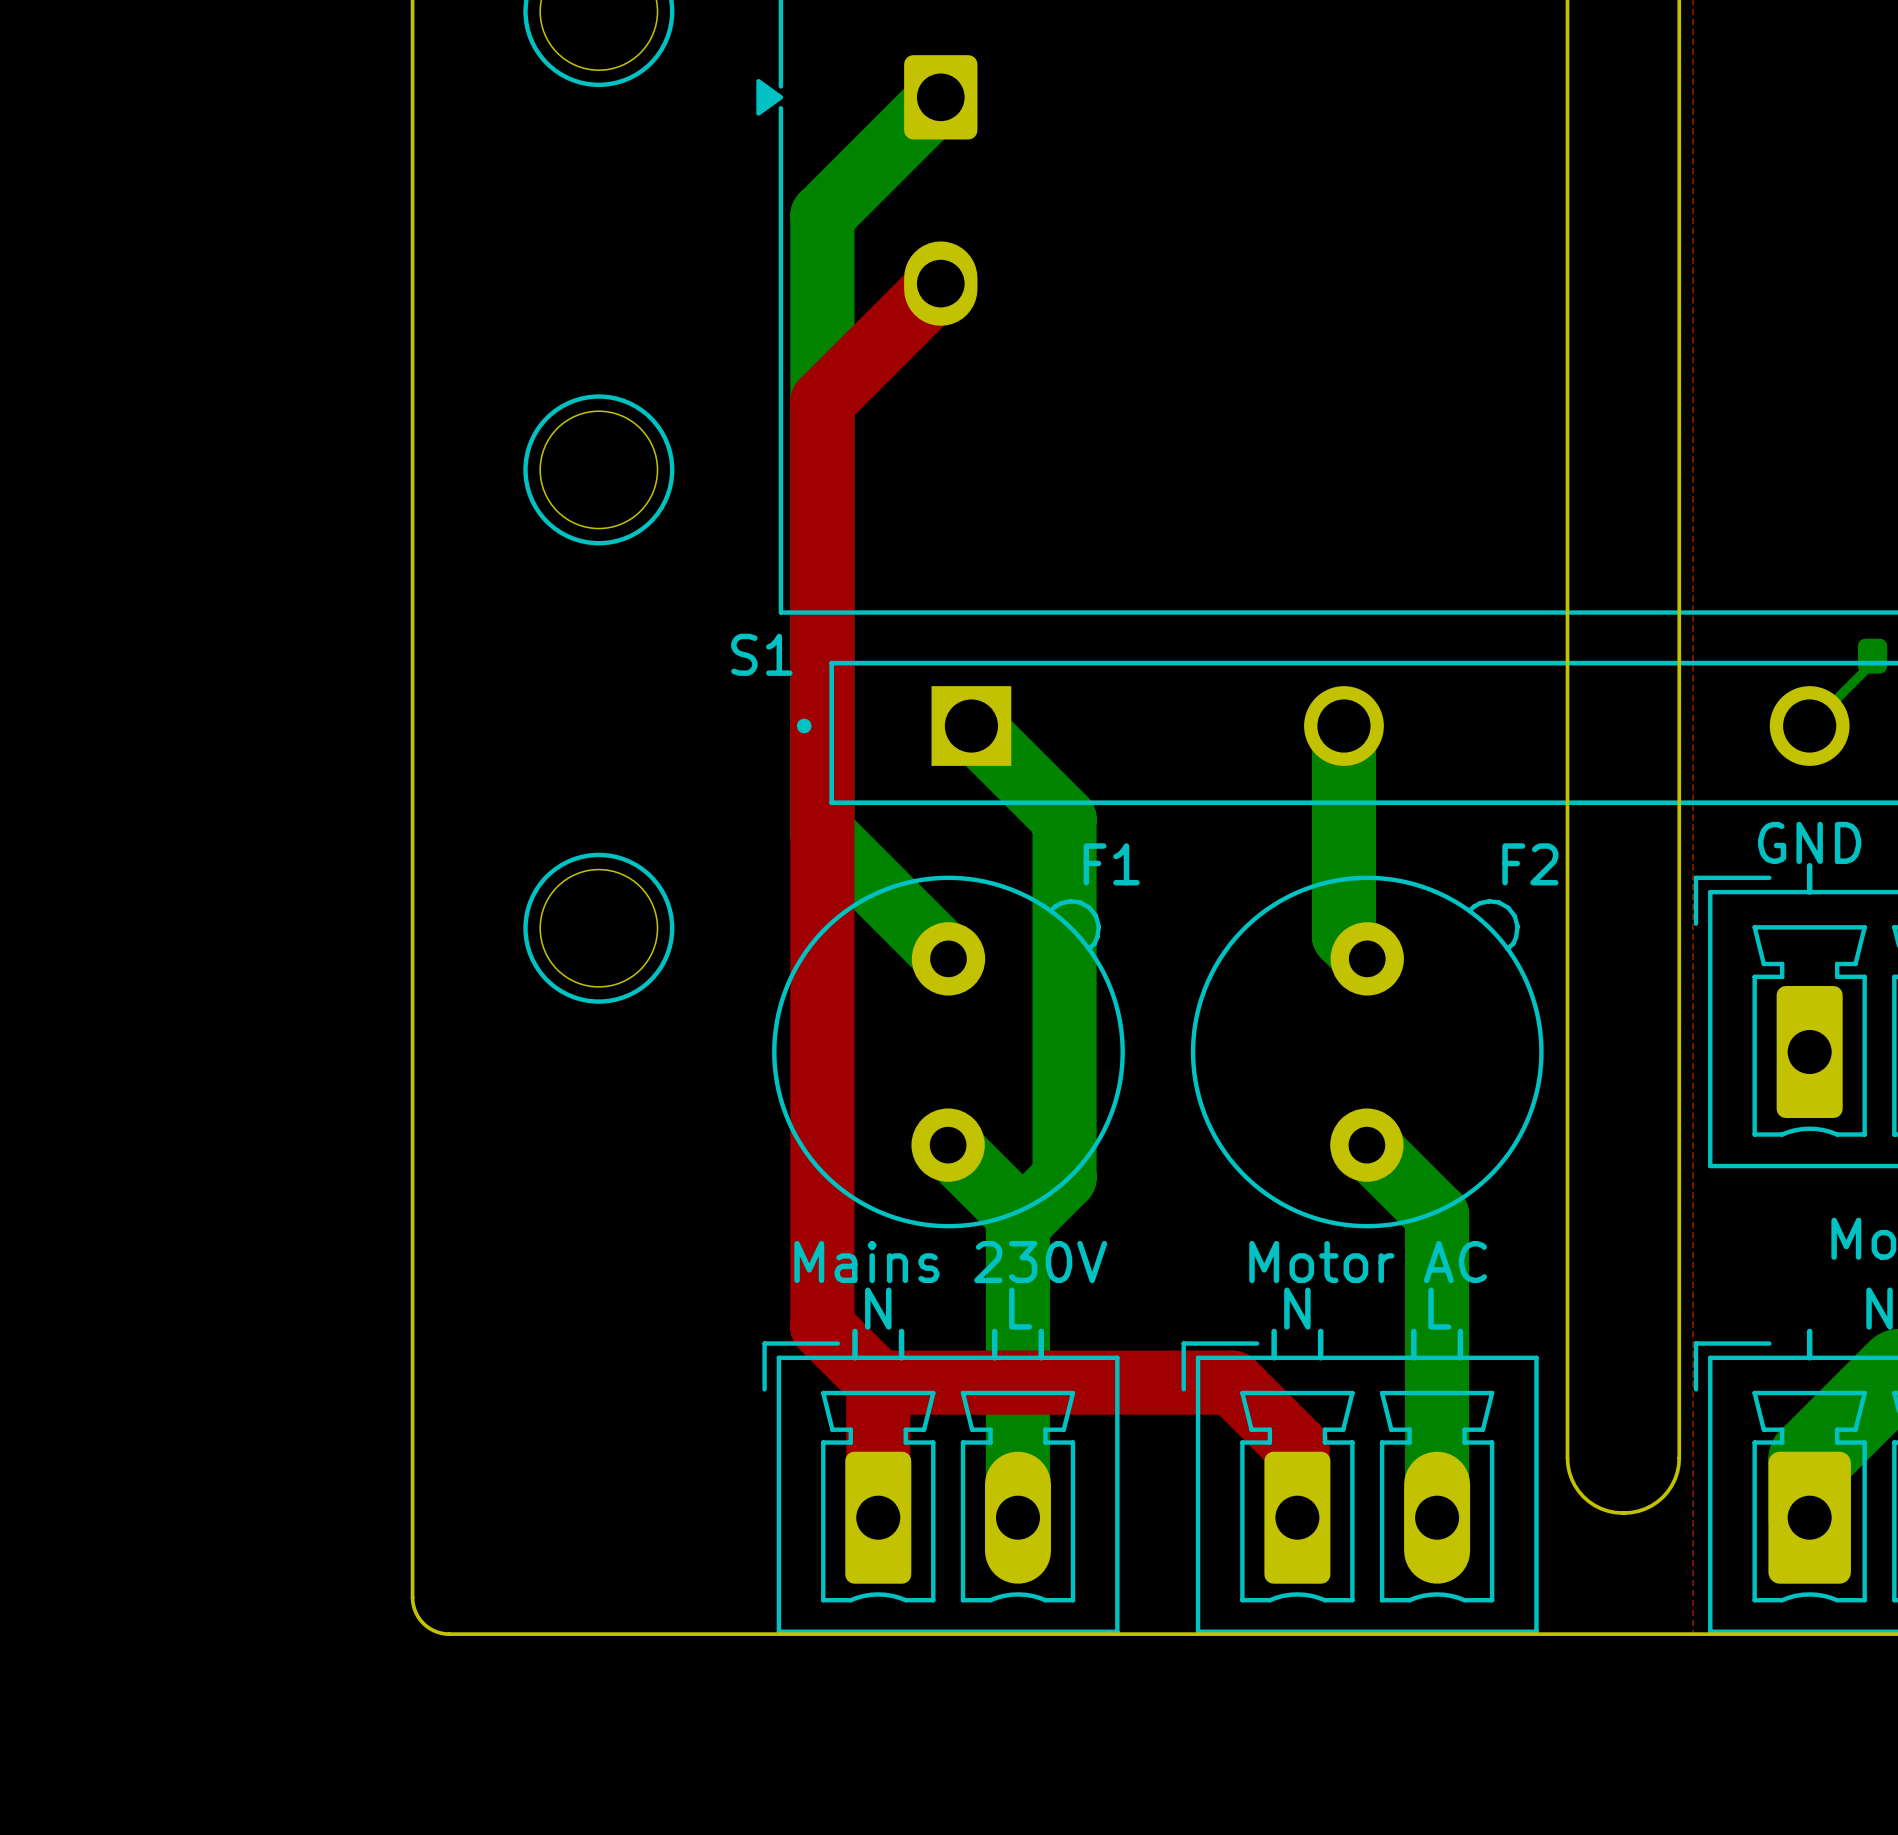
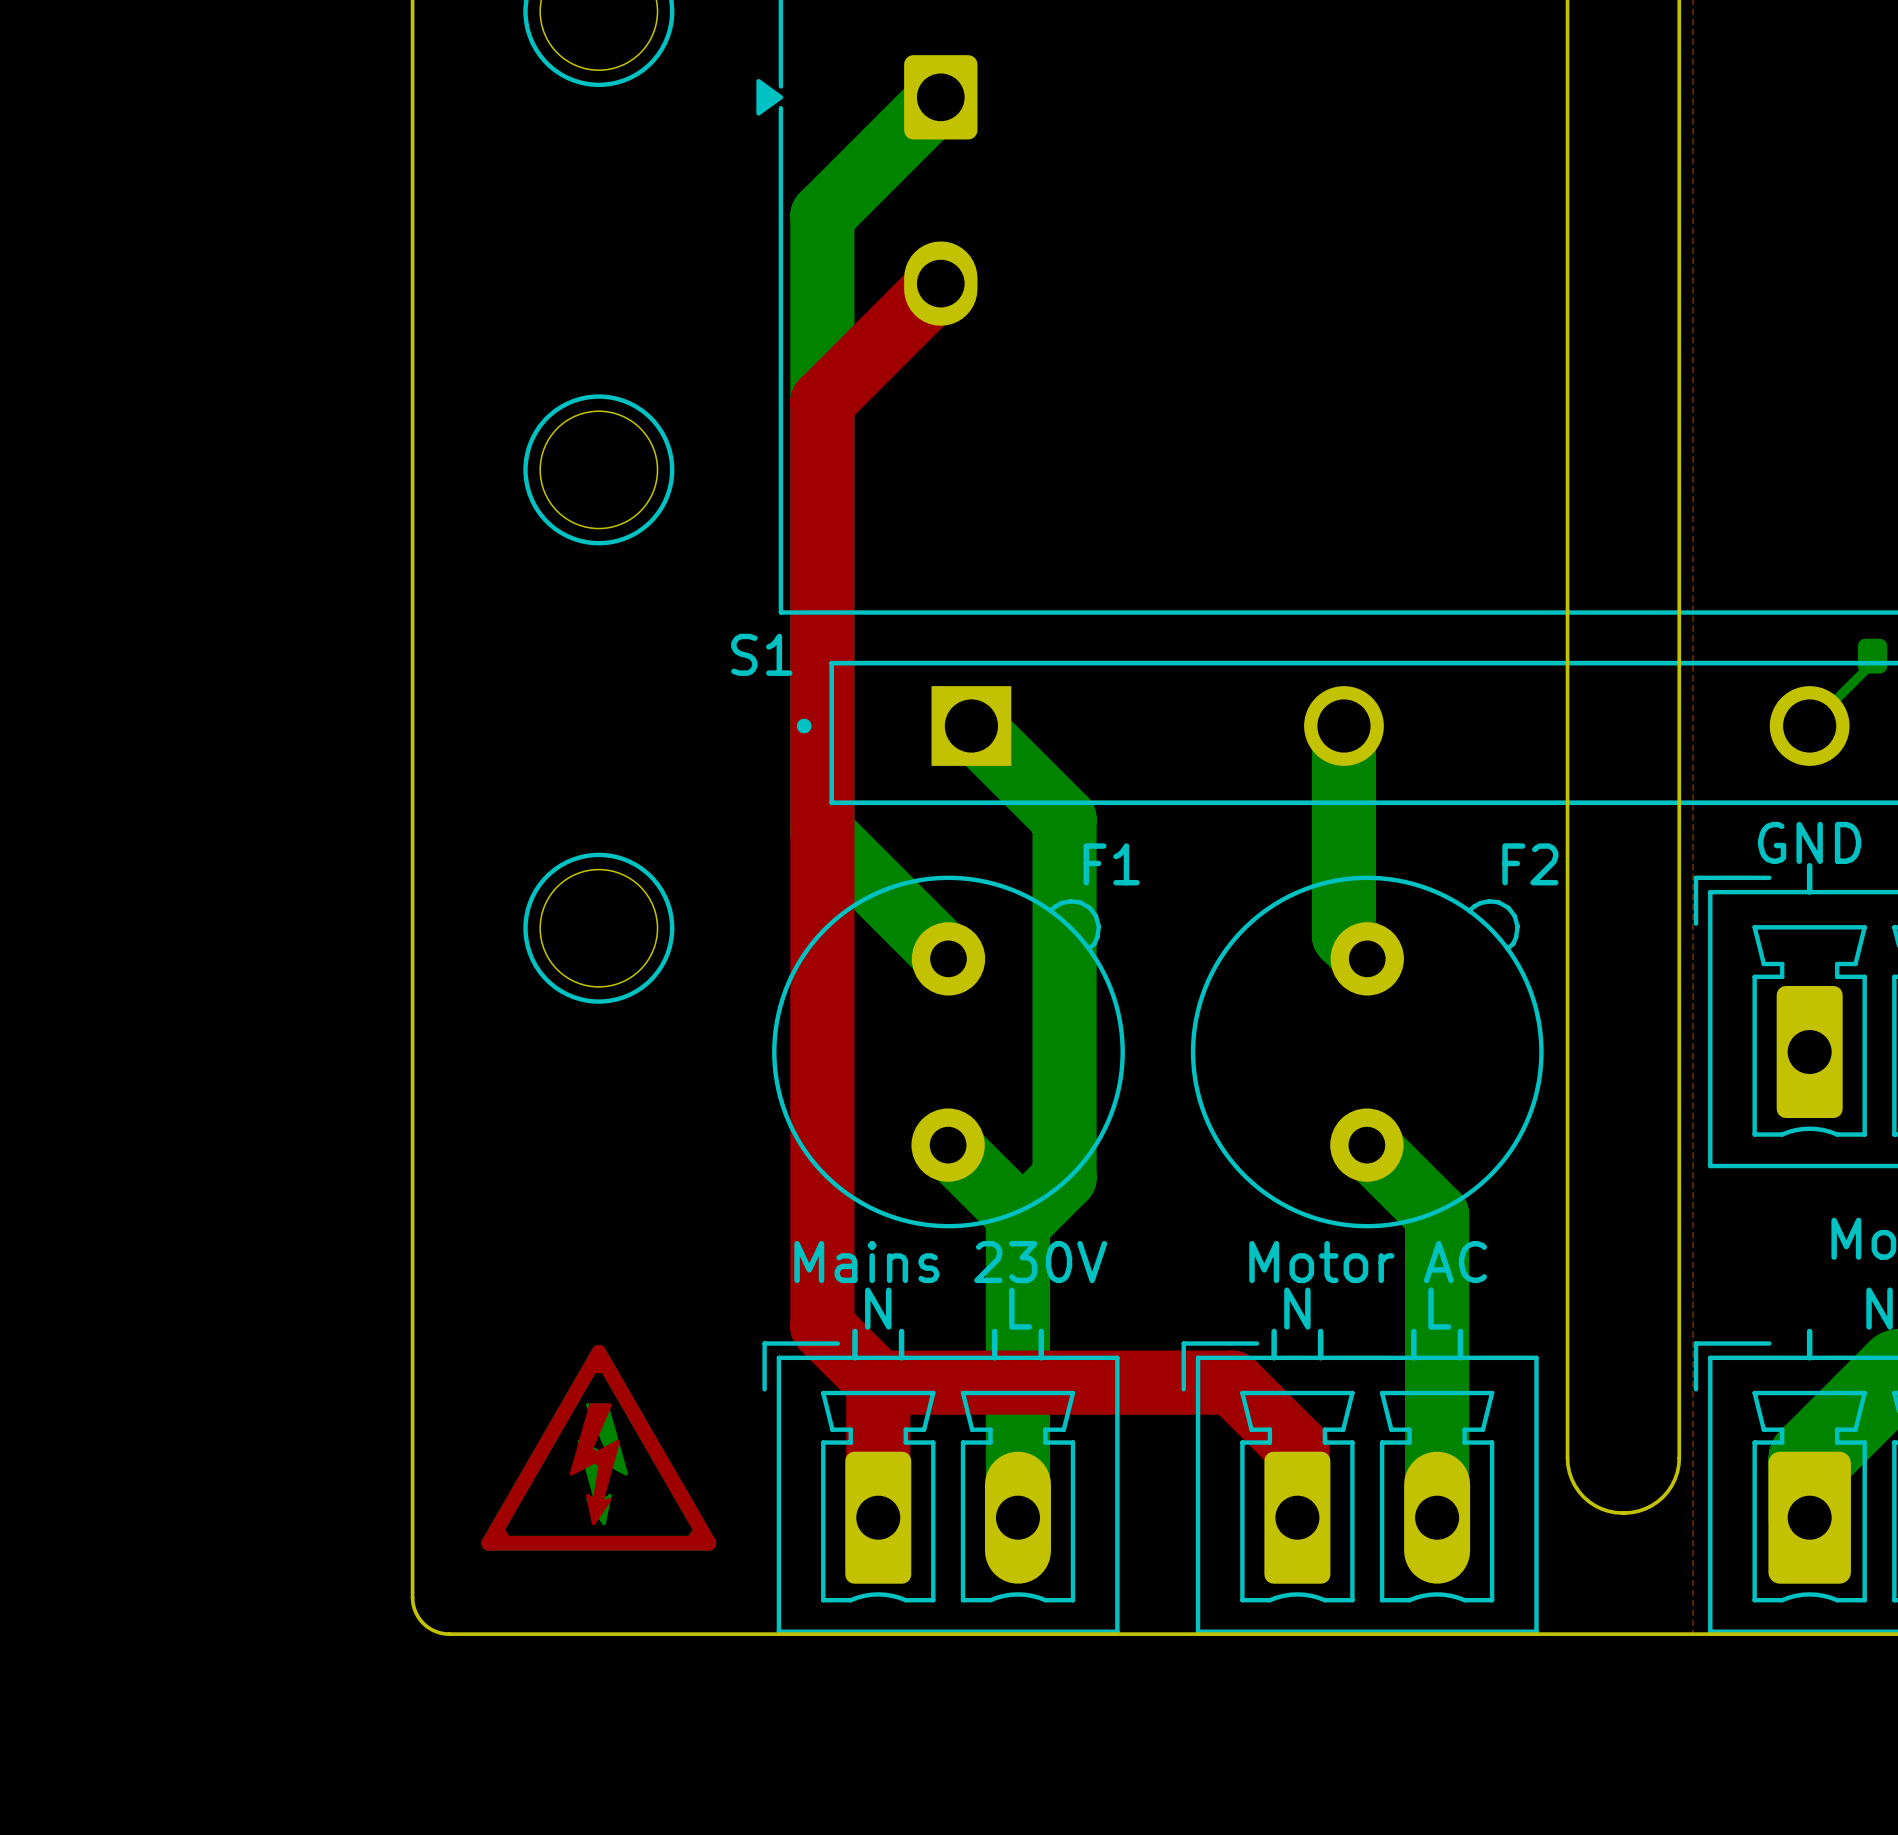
drawing: none -> [481, 1345, 717, 1551]

